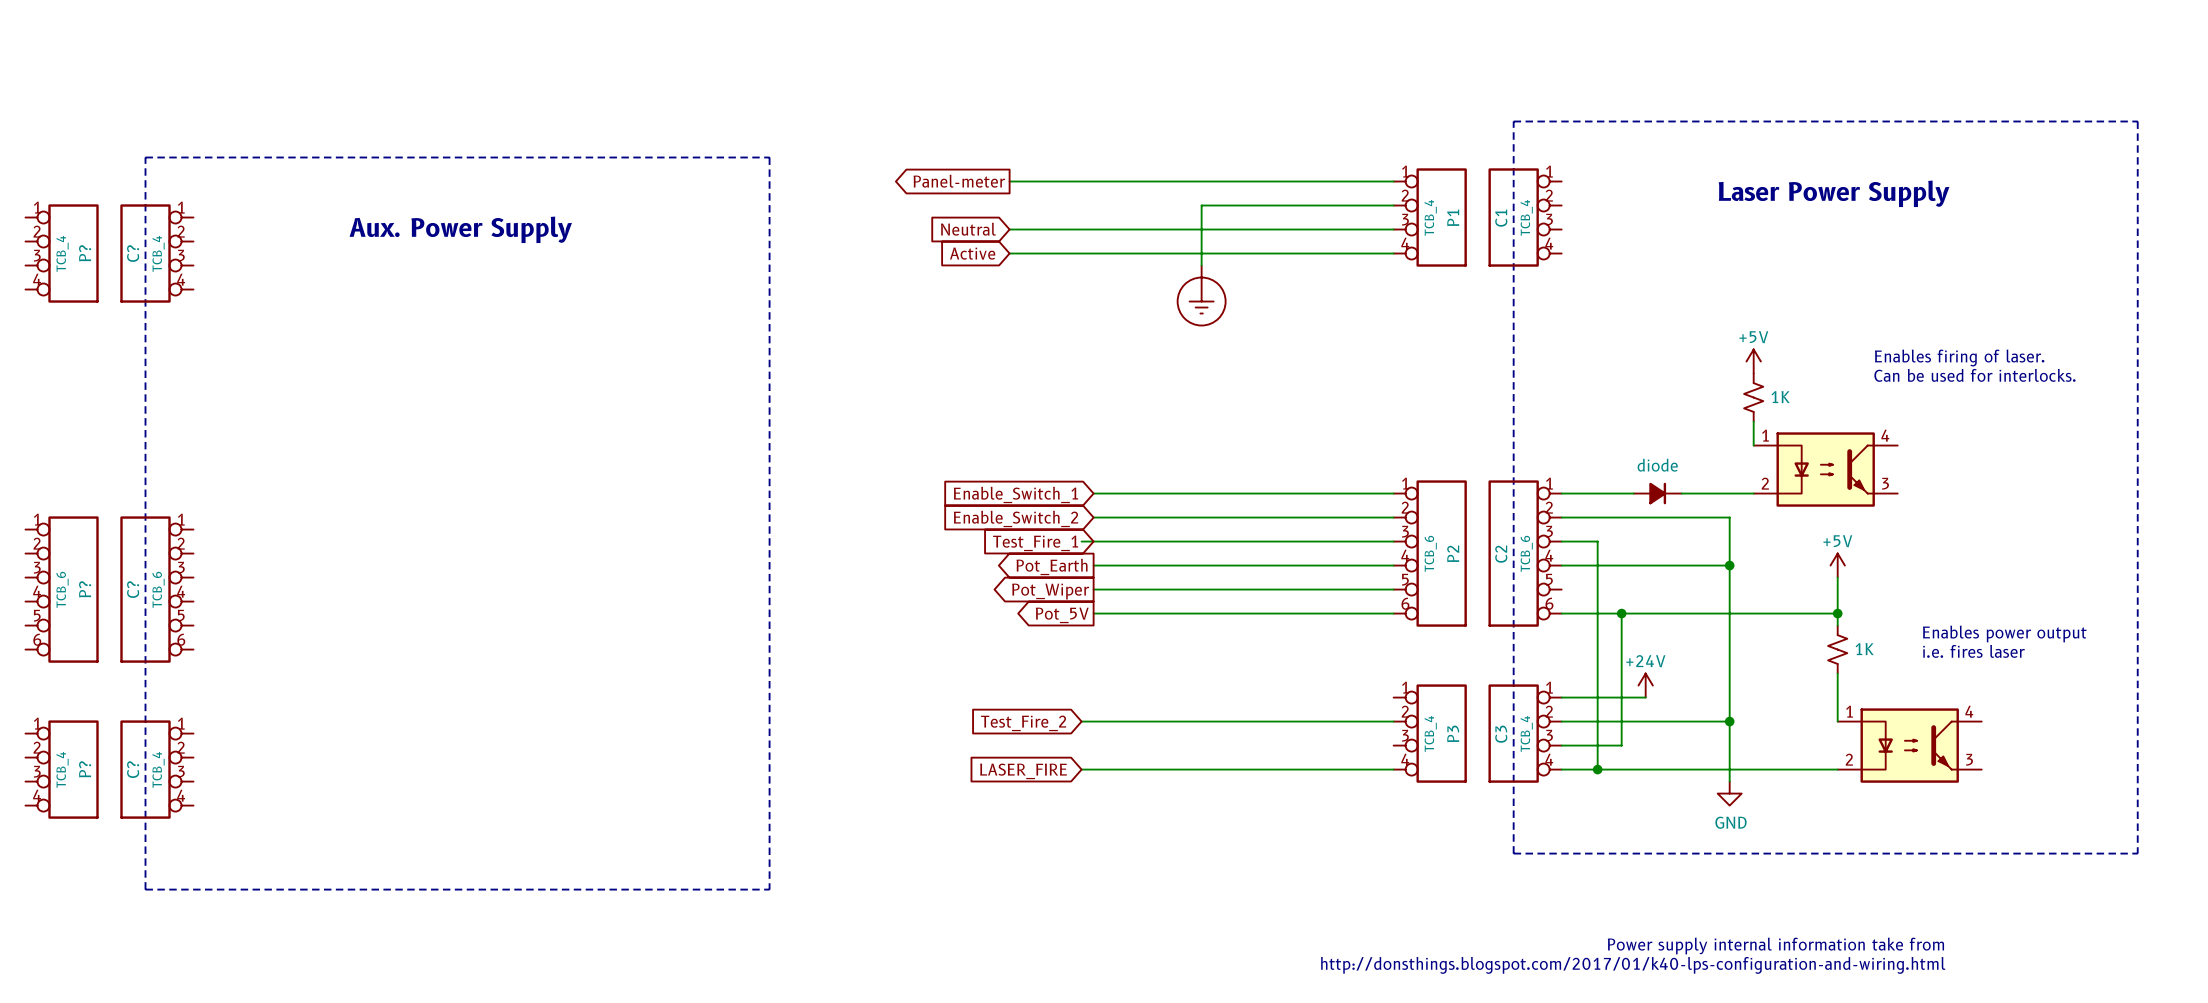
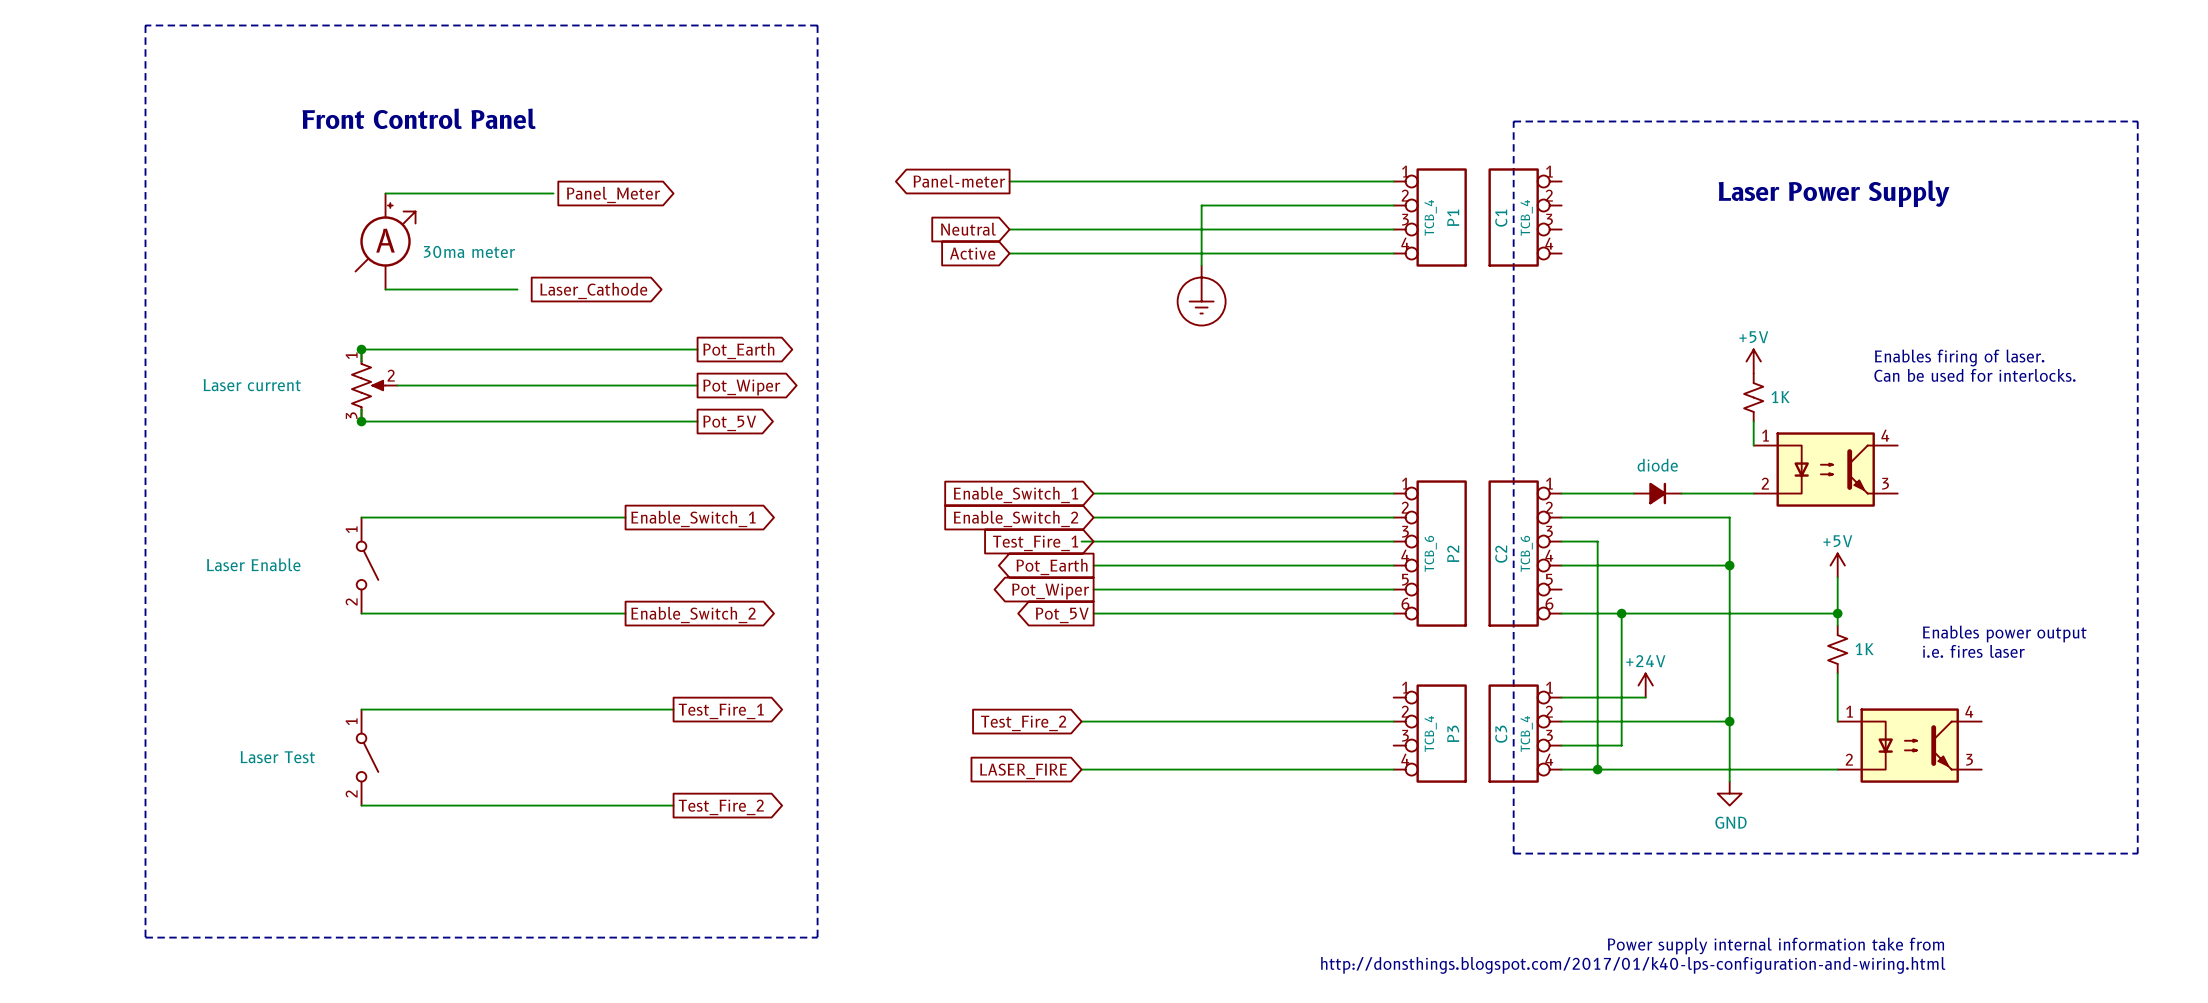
text: none -> Front Control Panel (419, 118)
line: (145, 157) (769, 157) (769, 889) (145, 889) -> (145, 157) (145, 25) (817, 25) (817, 937) (145, 937) (145, 889)
wire: none -> (385, 193) (553, 193)
global label: none -> Panel_Meter (613, 194)
text: Aux. Power Supply (460, 229) -> none
part: none -> 30ma meter (385, 241)
P?: TCB_4 (62, 253) -> none
C?: TCB_4 (156, 253) -> none
wire: none -> (385, 289) (517, 289)
global label: none -> Laser_Cathode (593, 290)
junction: none -> (361, 349)
wire: none -> (697, 349) (361, 349) (361, 361)
global label: none -> Pot_Earth (738, 350)
part: none -> Laser current (374, 385)
wire: none -> (397, 385) (697, 385)
global label: none -> Pot_Wiper (741, 387)
wire: none -> (361, 409) (361, 421) (697, 421)
junction: none -> (361, 421)
global label: none -> Pot_5V (729, 423)
wire: none -> (361, 517) (625, 517)
global label: none -> Enable_Switch_1 (693, 518)
part: none -> Laser Enable (367, 565)
P?: TCB_6 (62, 589) -> none
C?: TCB_6 (156, 589) -> none
wire: none -> (361, 613) (625, 613)
global label: none -> Enable_Switch_2 (693, 614)
wire: none -> (361, 709) (673, 709)
global label: none -> Test_Fire_1 (721, 711)
part: none -> Laser Test (367, 757)
P?: TCB_4 (62, 769) -> none
C?: TCB_4 (156, 769) -> none
wire: none -> (361, 805) (673, 805)
global label: none -> Test_Fire_2 (721, 807)

